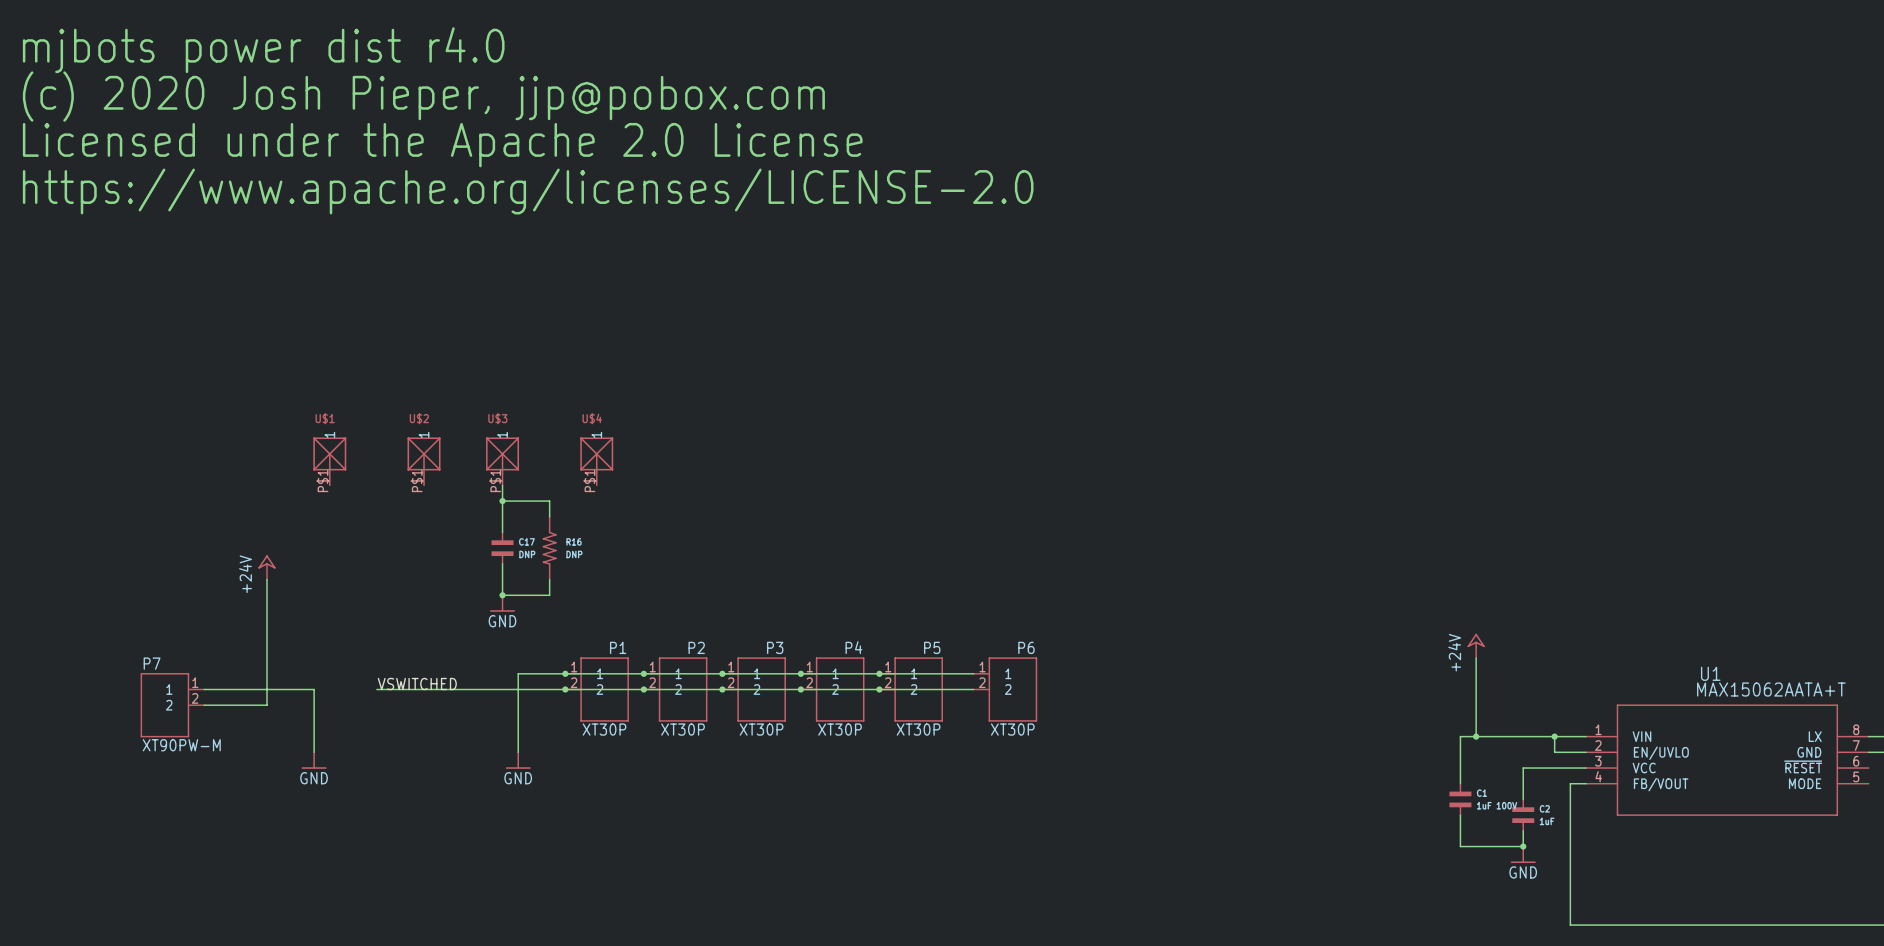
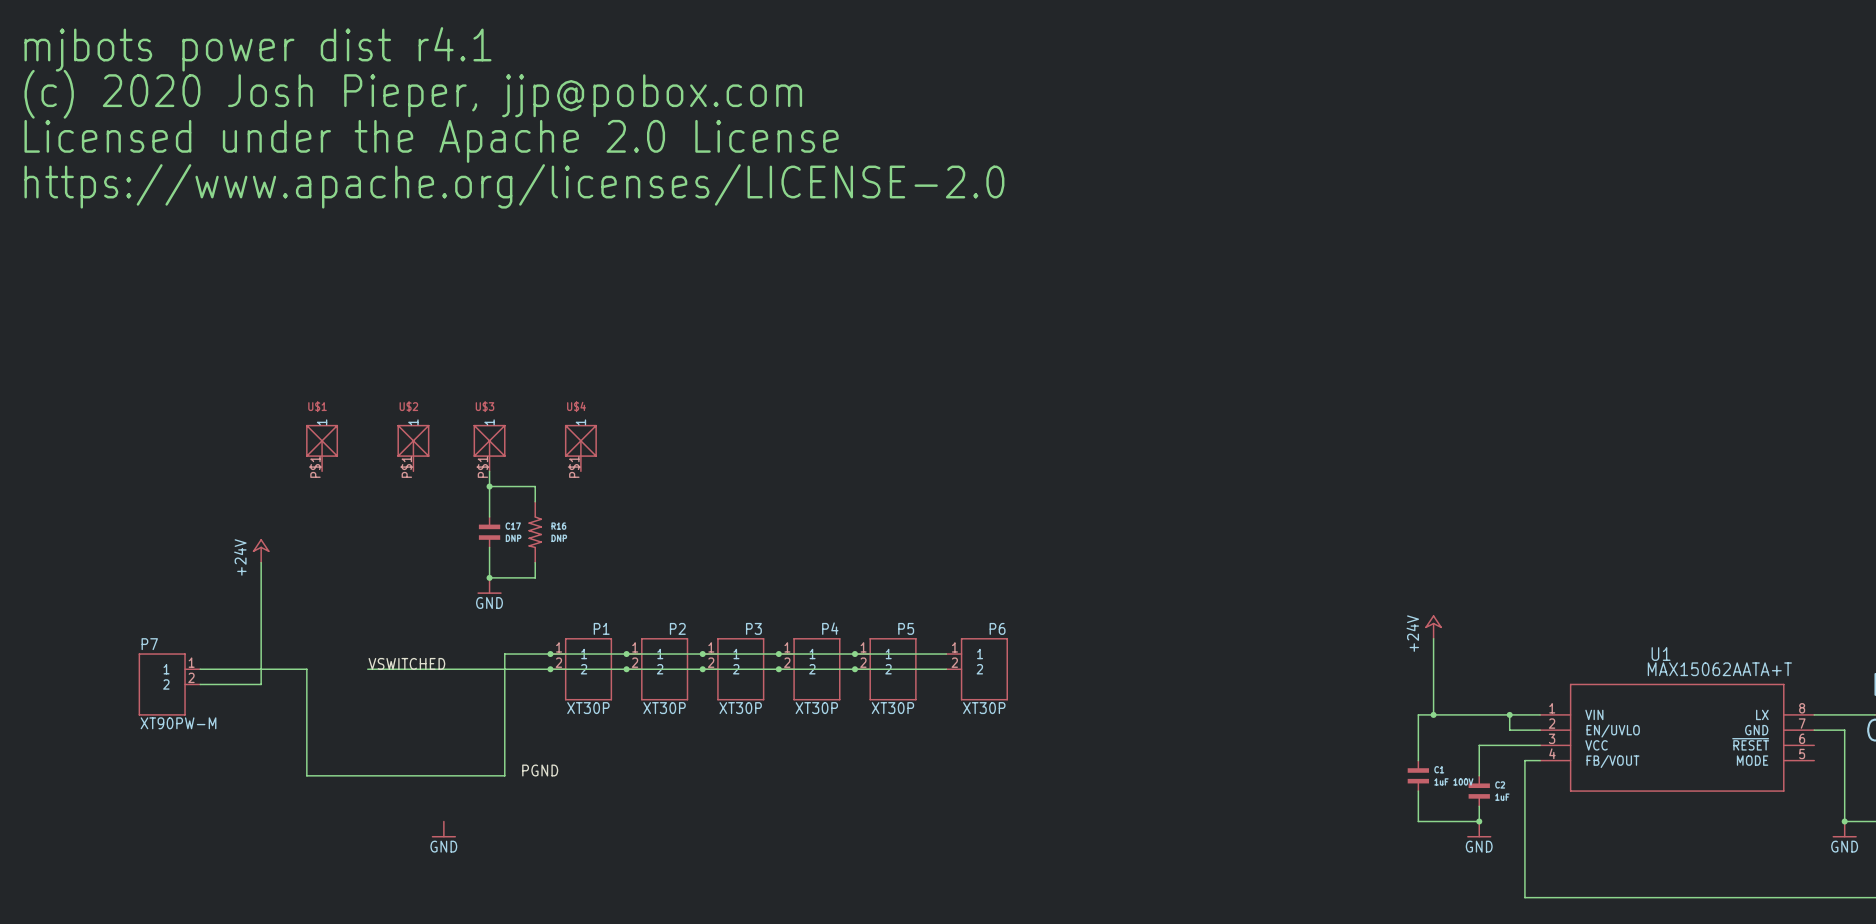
text: mjbots power dist r4.0 (263, 50) -> mjbots power dist r4.1 (257, 49)
wire: none -> (306, 730) (306, 775) (504, 775) (504, 730)
power symbol: GND (314, 760) -> none
power symbol: GND (518, 760) -> none
label: none -> PGND (540, 770)
power symbol: none -> GND (443, 829)

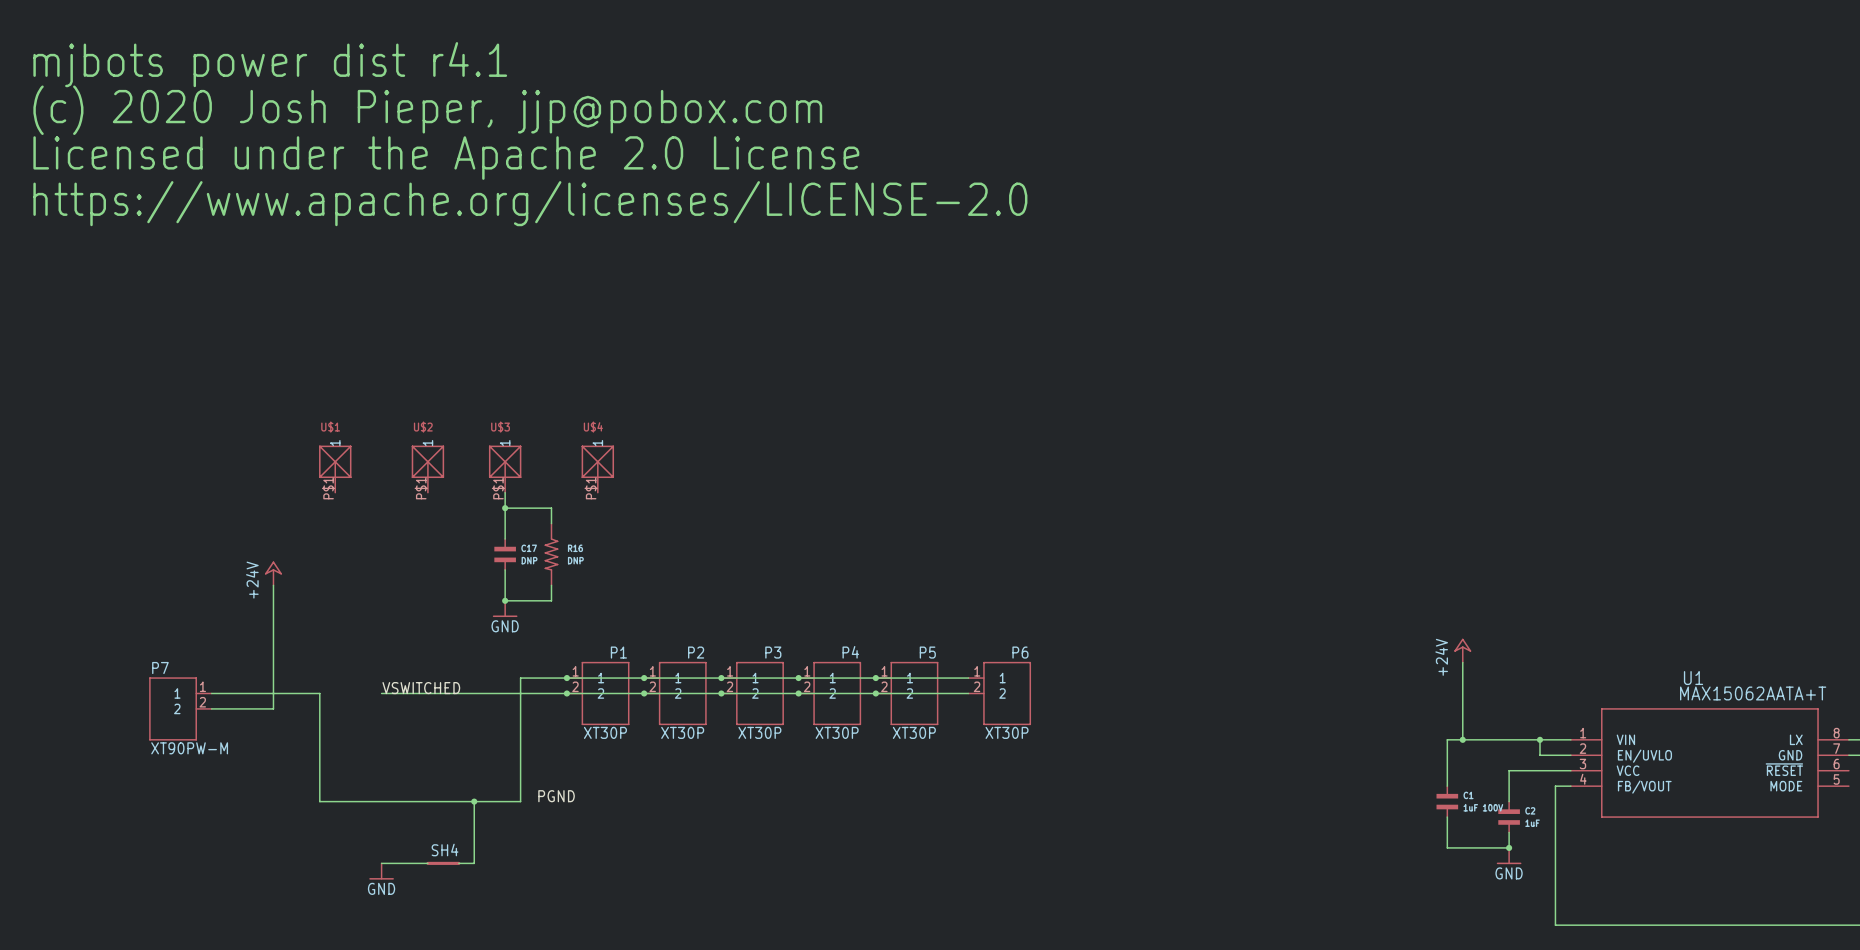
wire: none -> (474, 801) (474, 863) (458, 863)
junction: none -> (474, 801)
power symbol position: GND (443, 829) -> GND (381, 871)
wire: none -> (381, 863) (427, 863)
SH4: none -> (443, 863)

